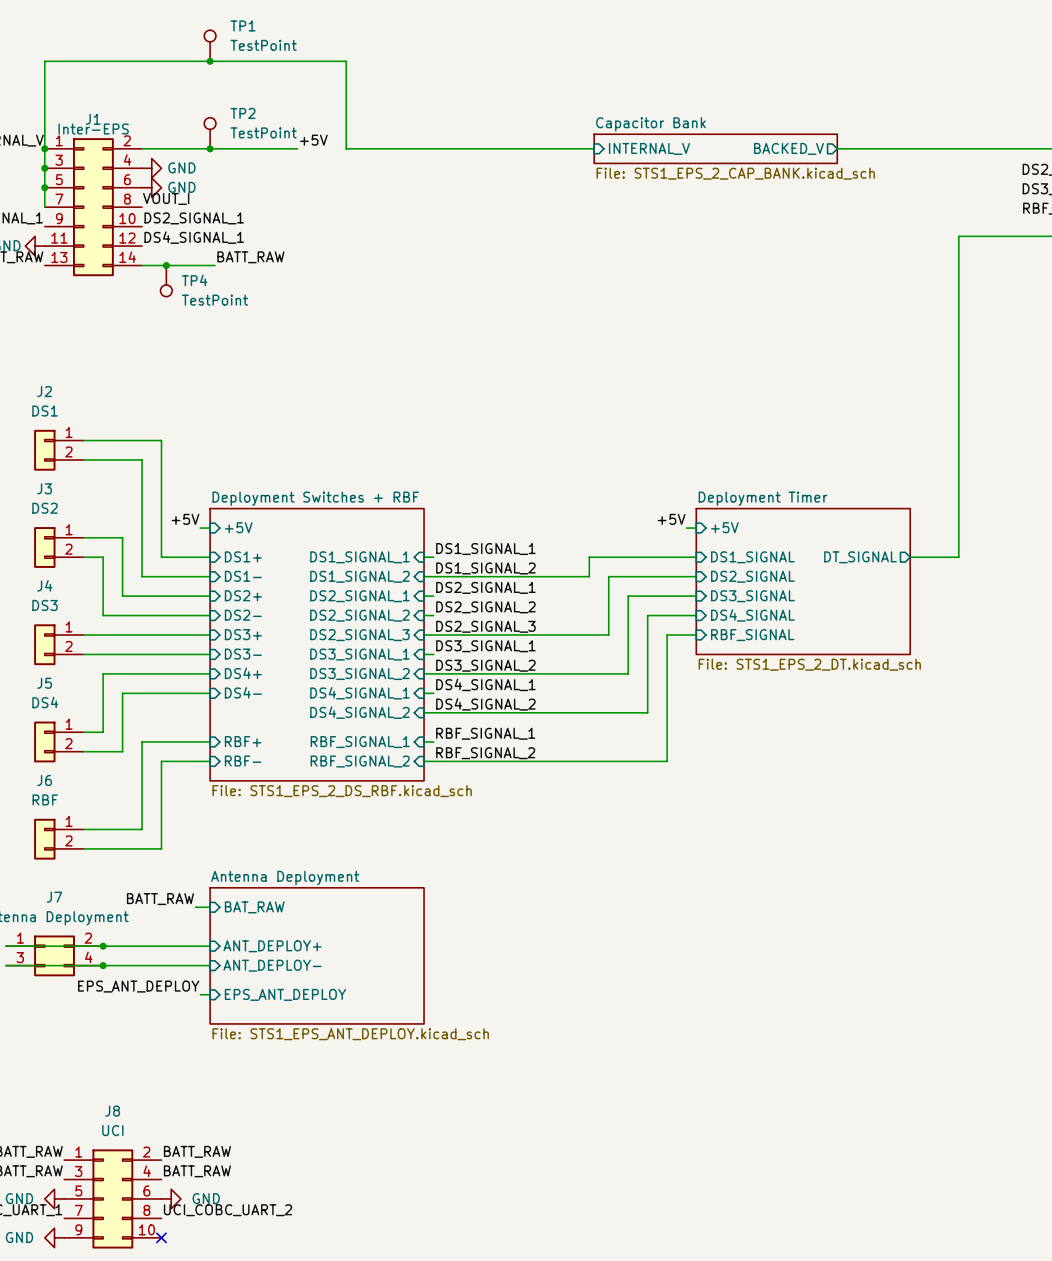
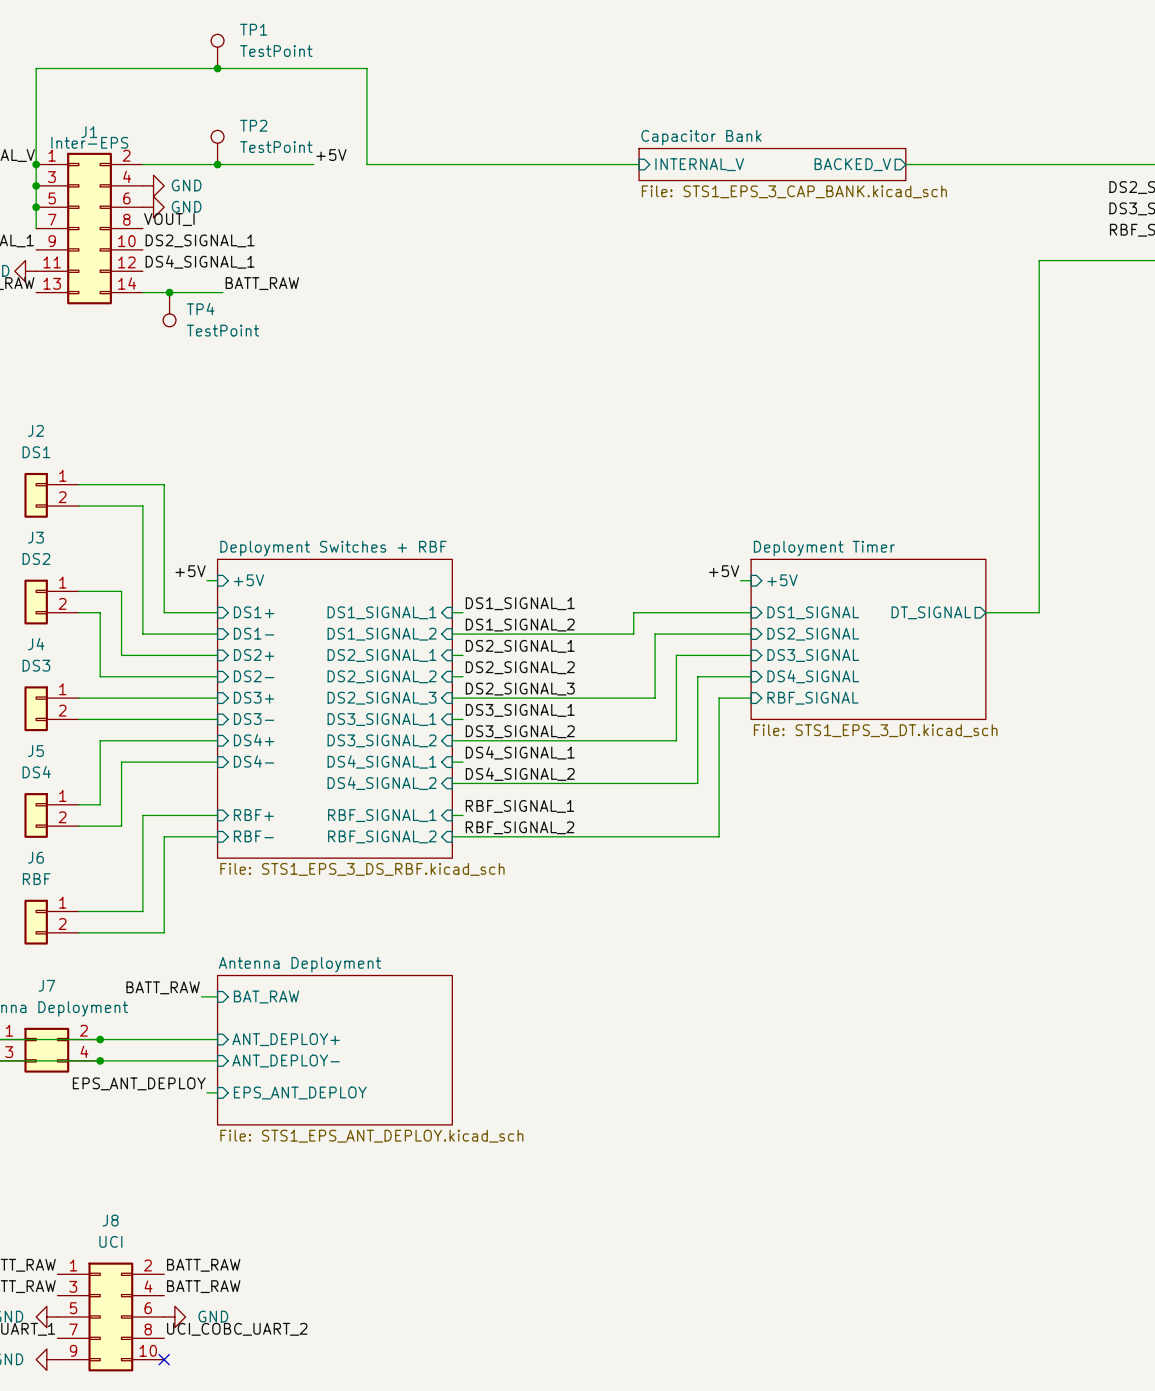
sheet Capacitor Bank value: File: STS1_EPS_2_CAP_BANK.kicad_sch (735, 173) -> File: STS1_EPS_3_CAP_BANK.kicad_sch (794, 191)
sheet Deployment Timer value: File: STS1_EPS_2_DT.kicad_sch (809, 664) -> File: STS1_EPS_3_DT.kicad_sch (875, 730)
sheet Deployment Switches + RBF value: File: STS1_EPS_2_DS_RBF.kicad_sch (342, 791) -> File: STS1_EPS_3_DS_RBF.kicad_sch (362, 869)

